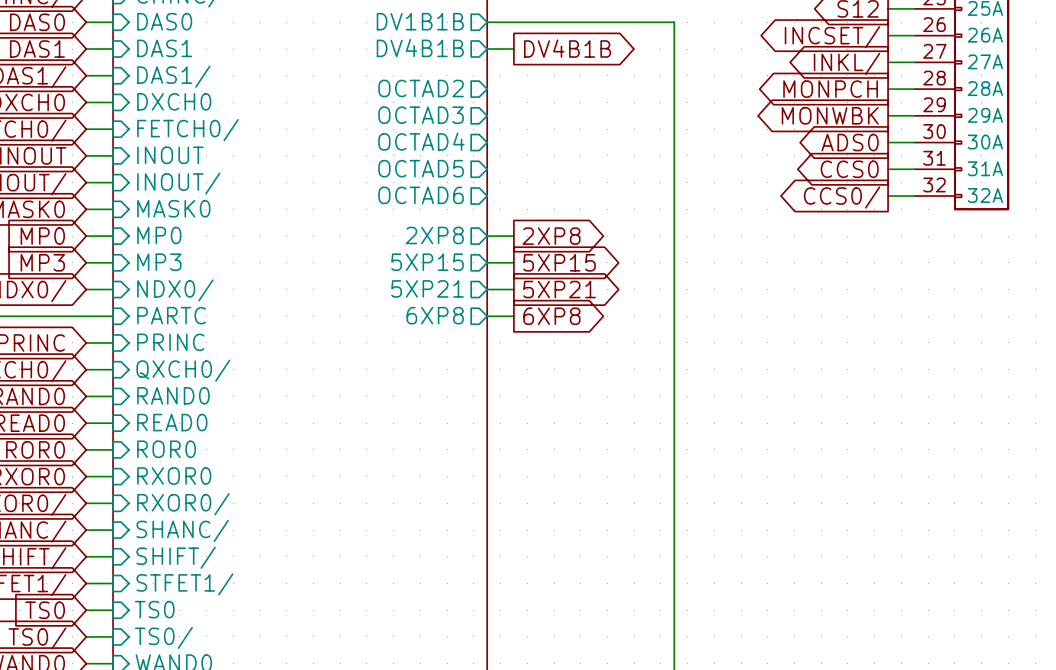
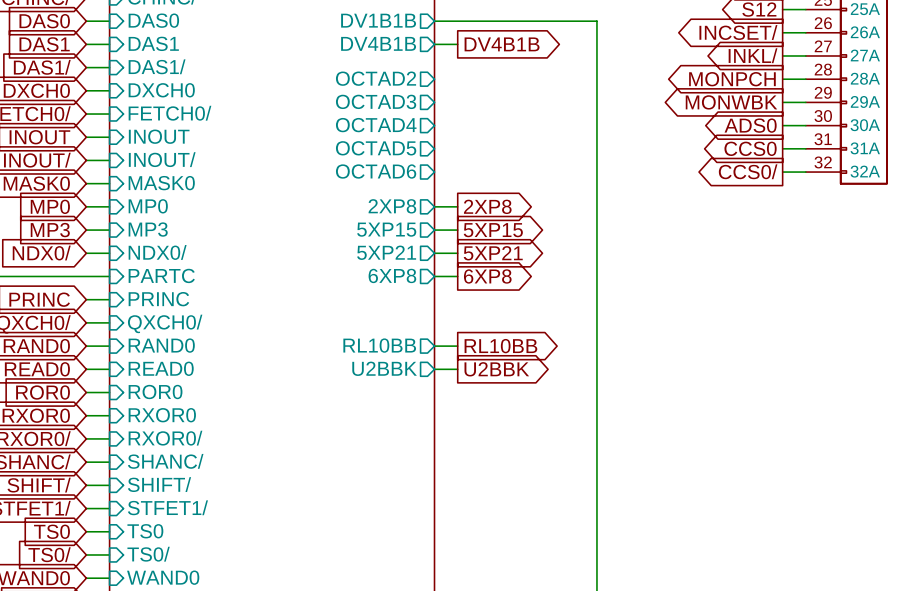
sheet pin: none -> RL10BB (379, 345)
wire: none -> (434, 346) (457, 346)
global label: none -> RL10BB (500, 346)
sheet pin: none -> U2BBK (384, 368)
wire: none -> (434, 369) (457, 369)
global label: none -> U2BBK (496, 369)

